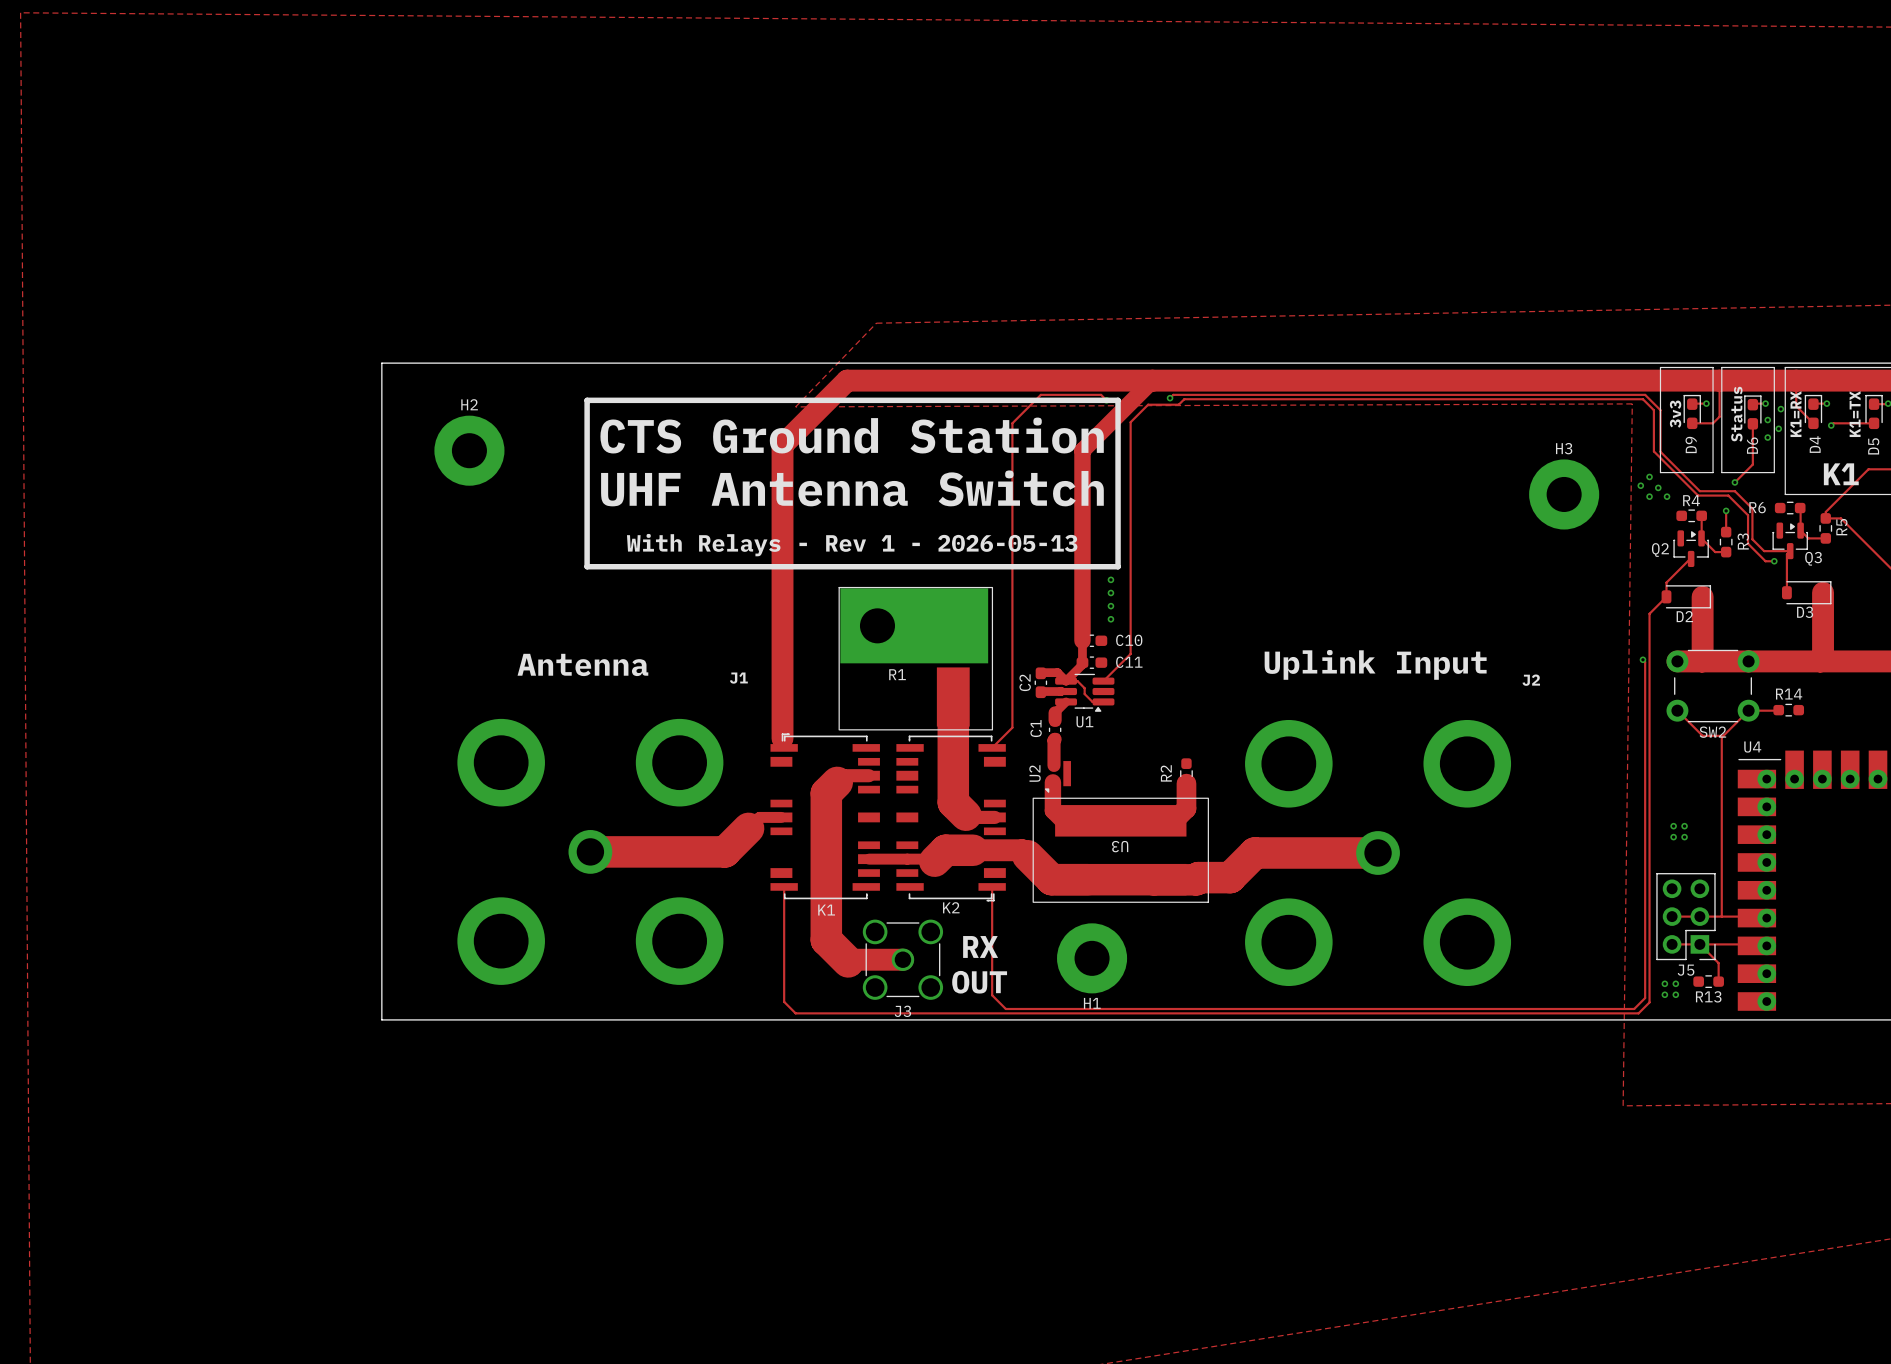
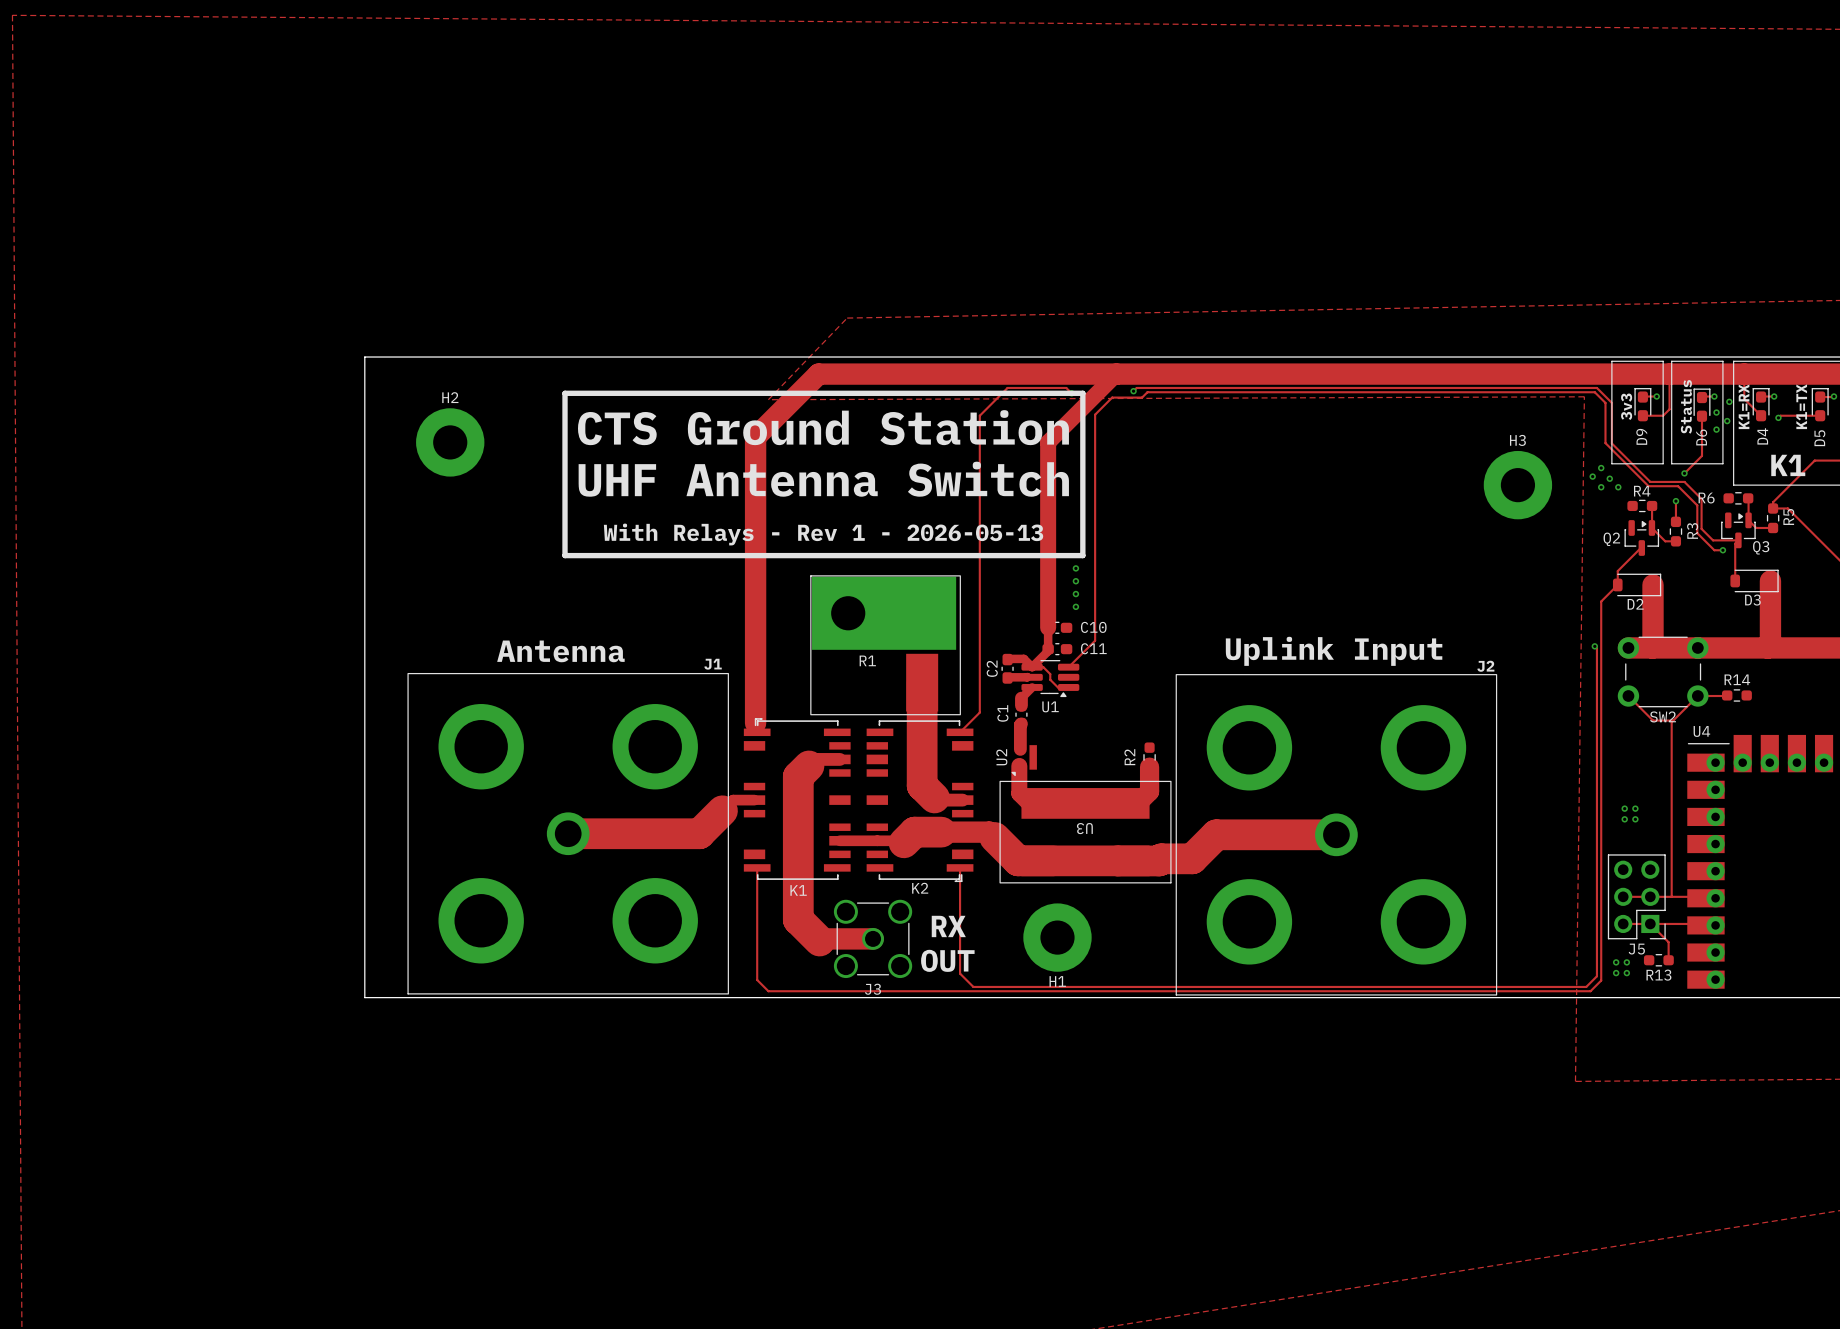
J1 footprint: [457, 718, 724, 985] -> [407, 673, 729, 995]
J2 footprint: [1245, 719, 1512, 987] -> [1175, 674, 1498, 996]

